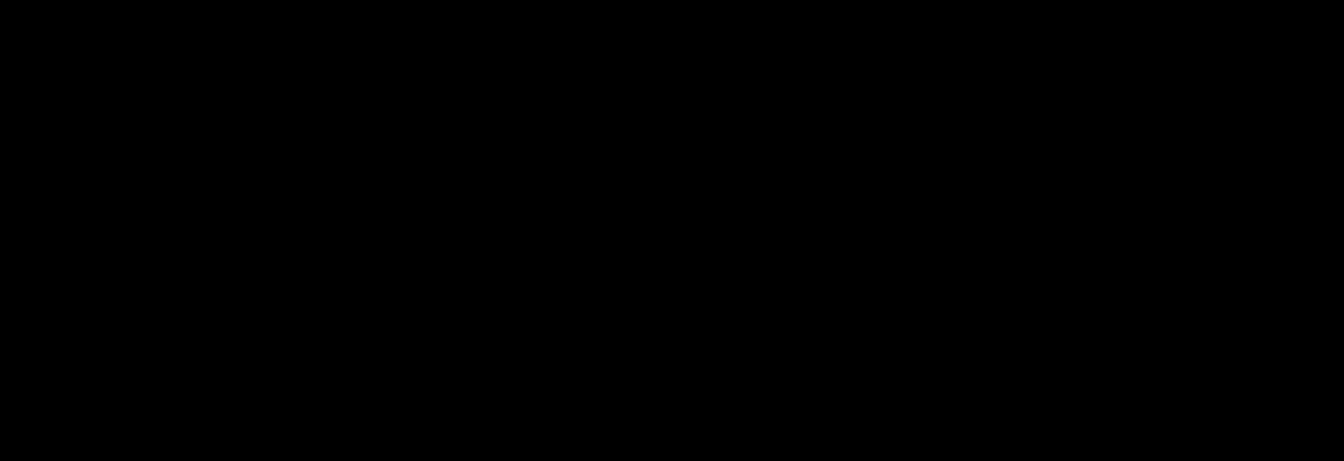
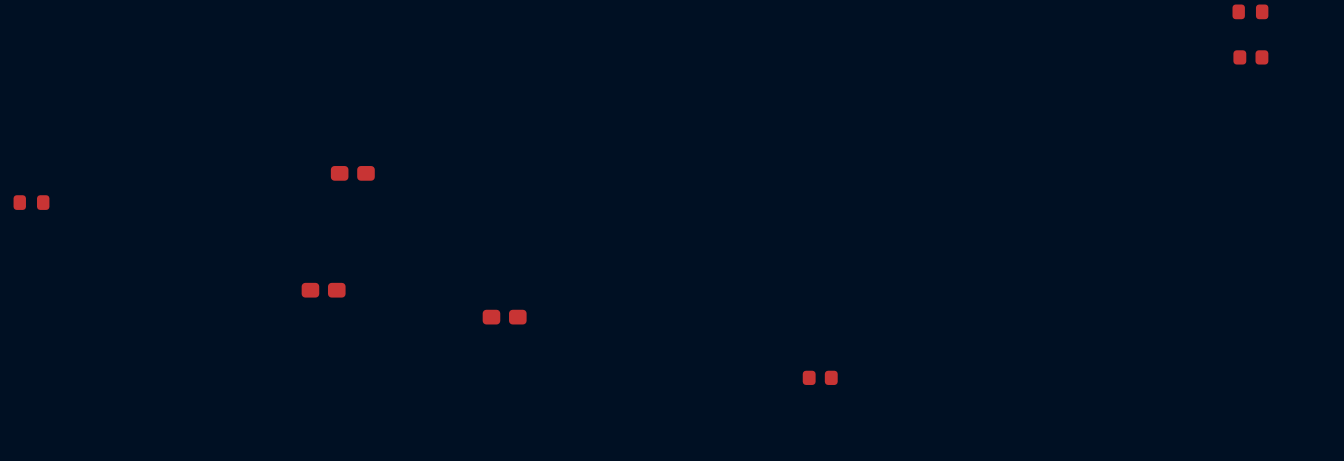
part: none -> (1250, 11)
part: none -> (1250, 57)
part: none -> (352, 173)
part: none -> (31, 202)
part: none -> (323, 290)
part: none -> (504, 317)
part: none -> (820, 377)

